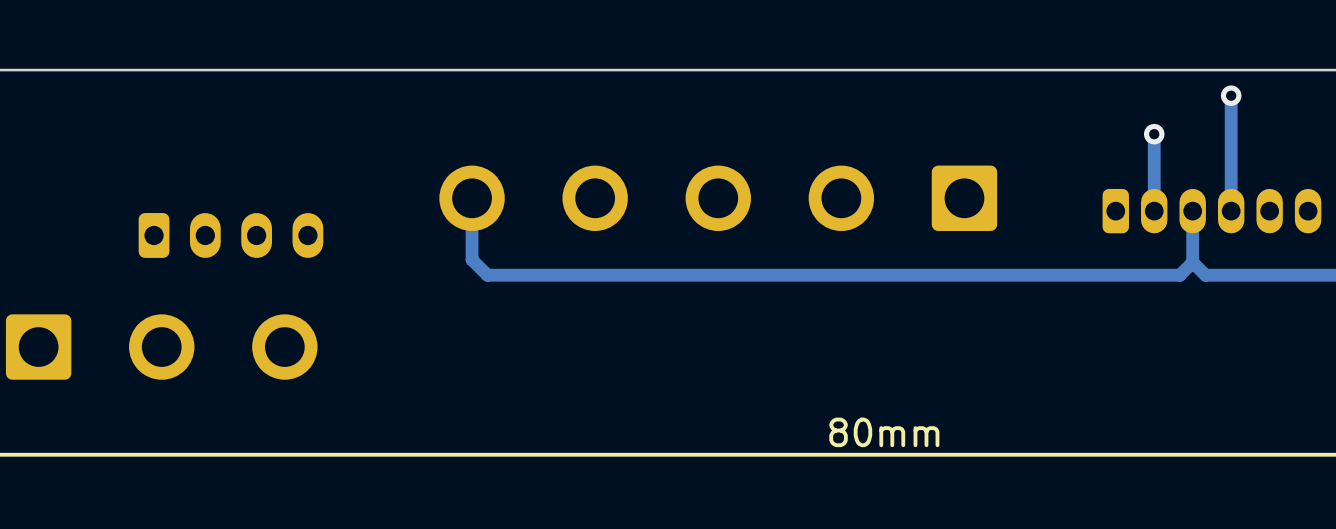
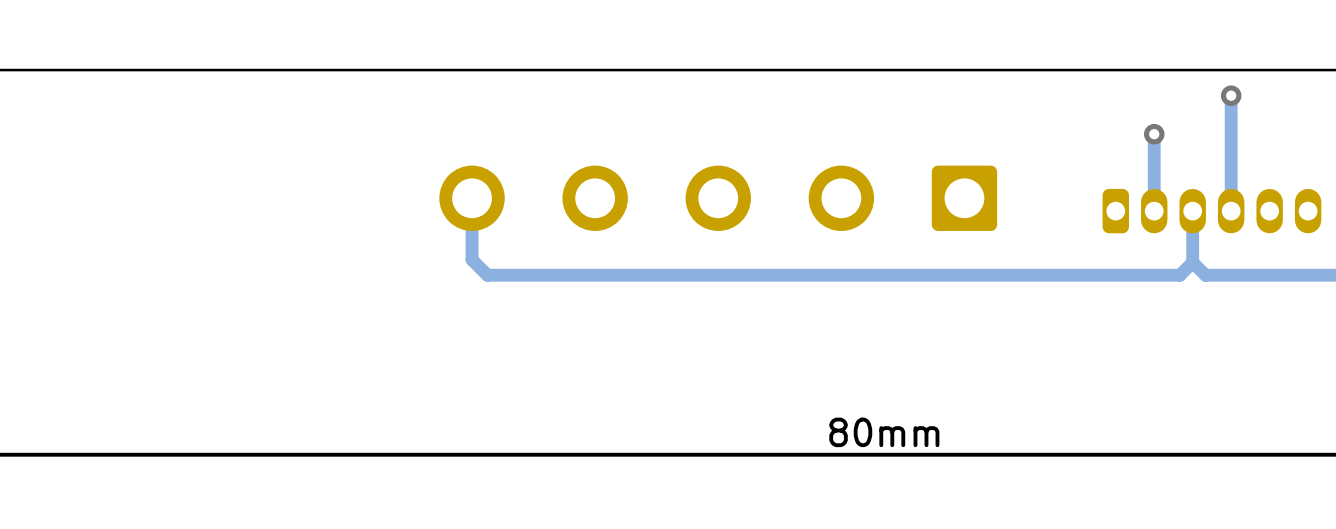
part: (230, 235) -> none
part: (161, 347) -> none

